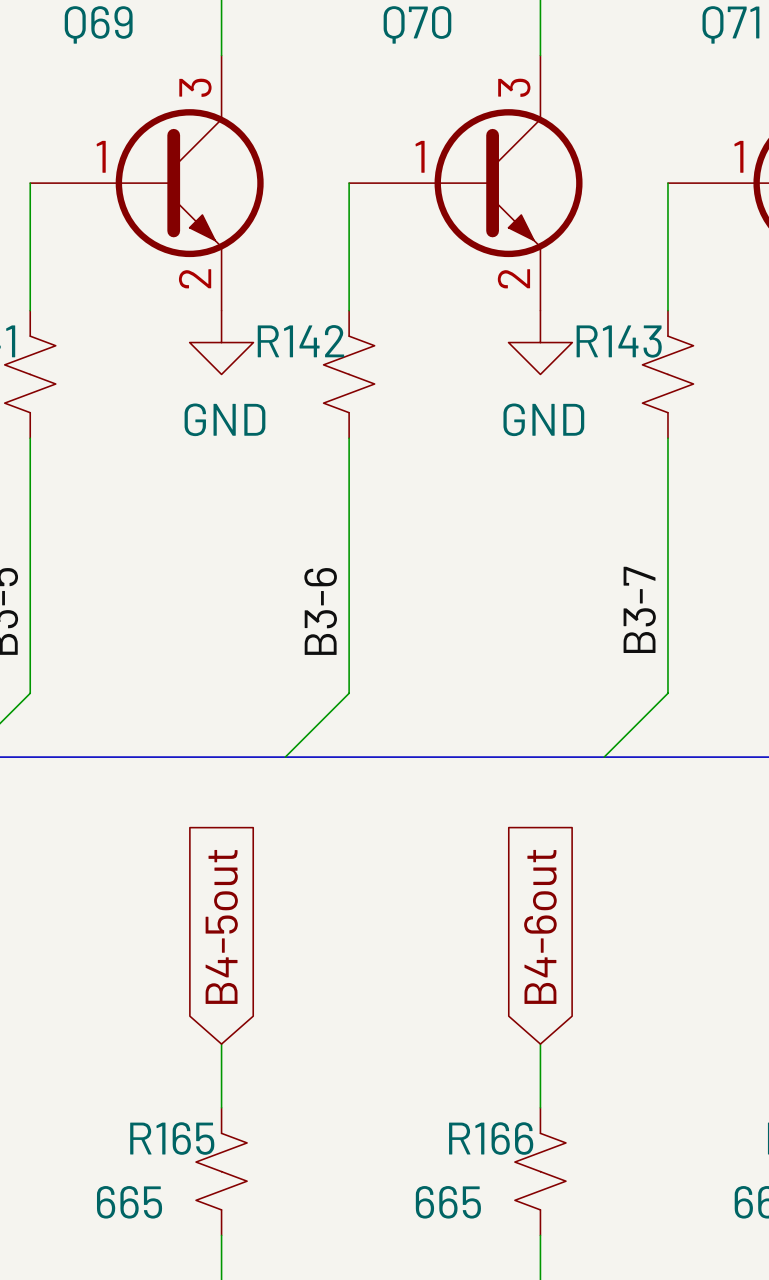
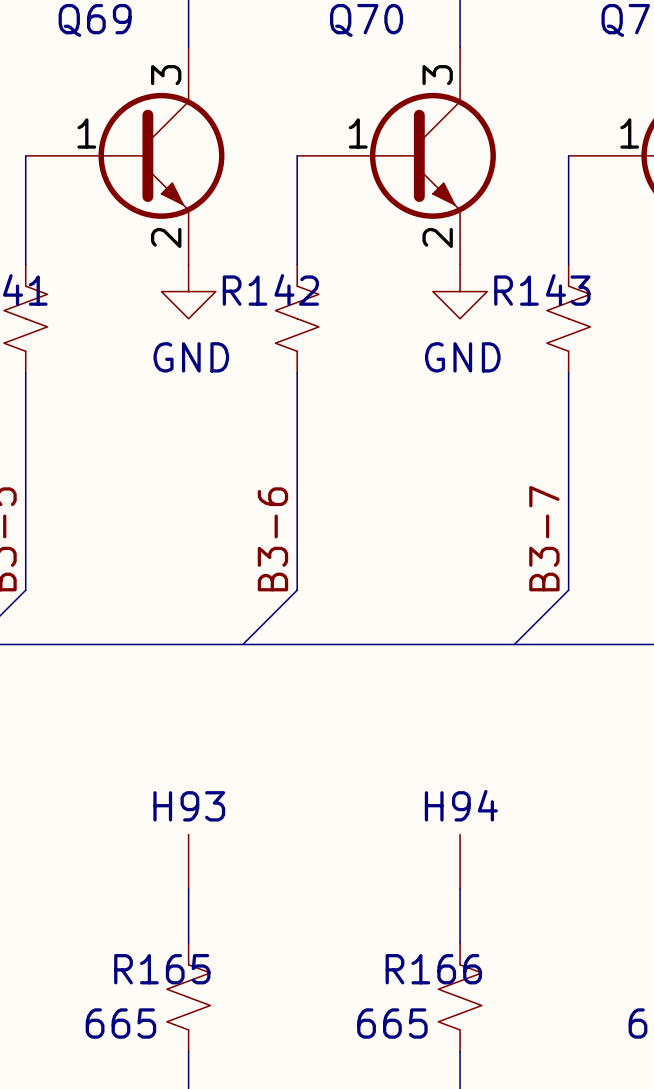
global label: B4-5out (221, 926) -> none
global label: B4-6out (540, 926) -> none
H93: none -> (188, 861)
H94: none -> (460, 861)

